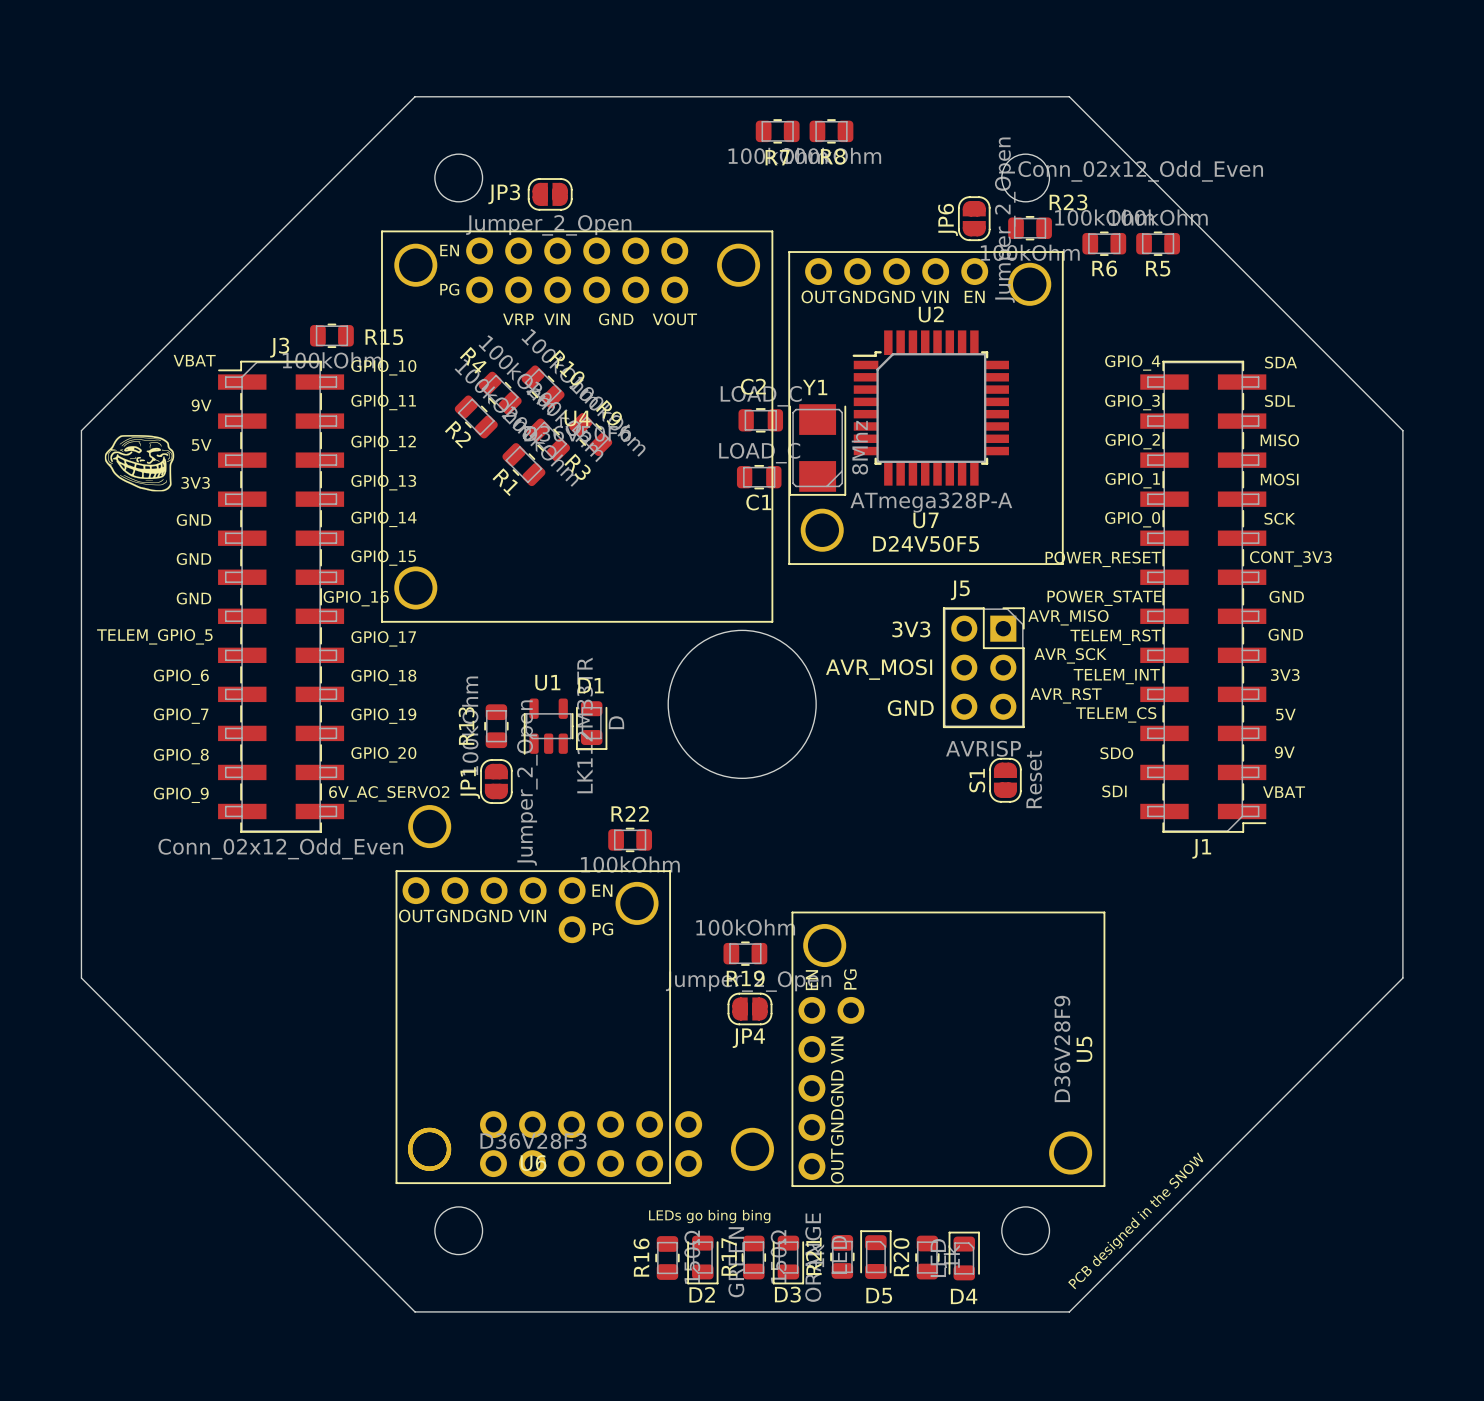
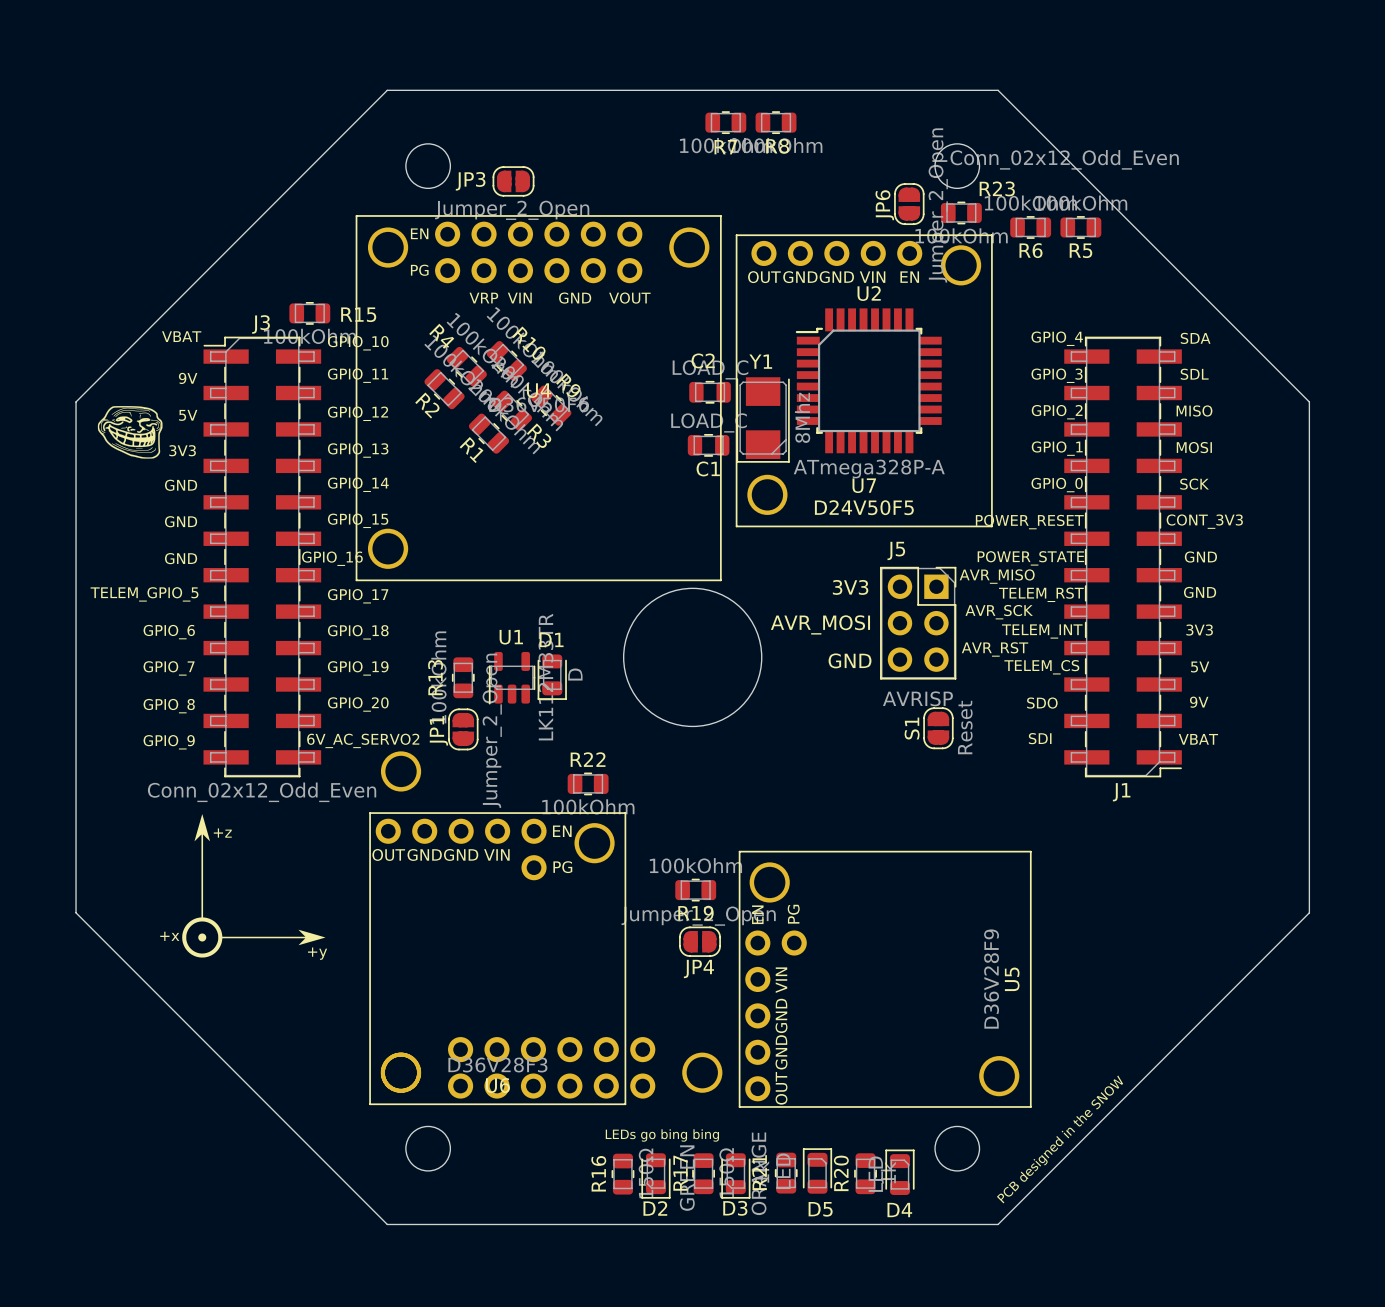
drawing: none -> [182, 814, 326, 958]
text: none -> +z (222, 833)
text: none -> +x (169, 936)
text: none -> +y (317, 953)

